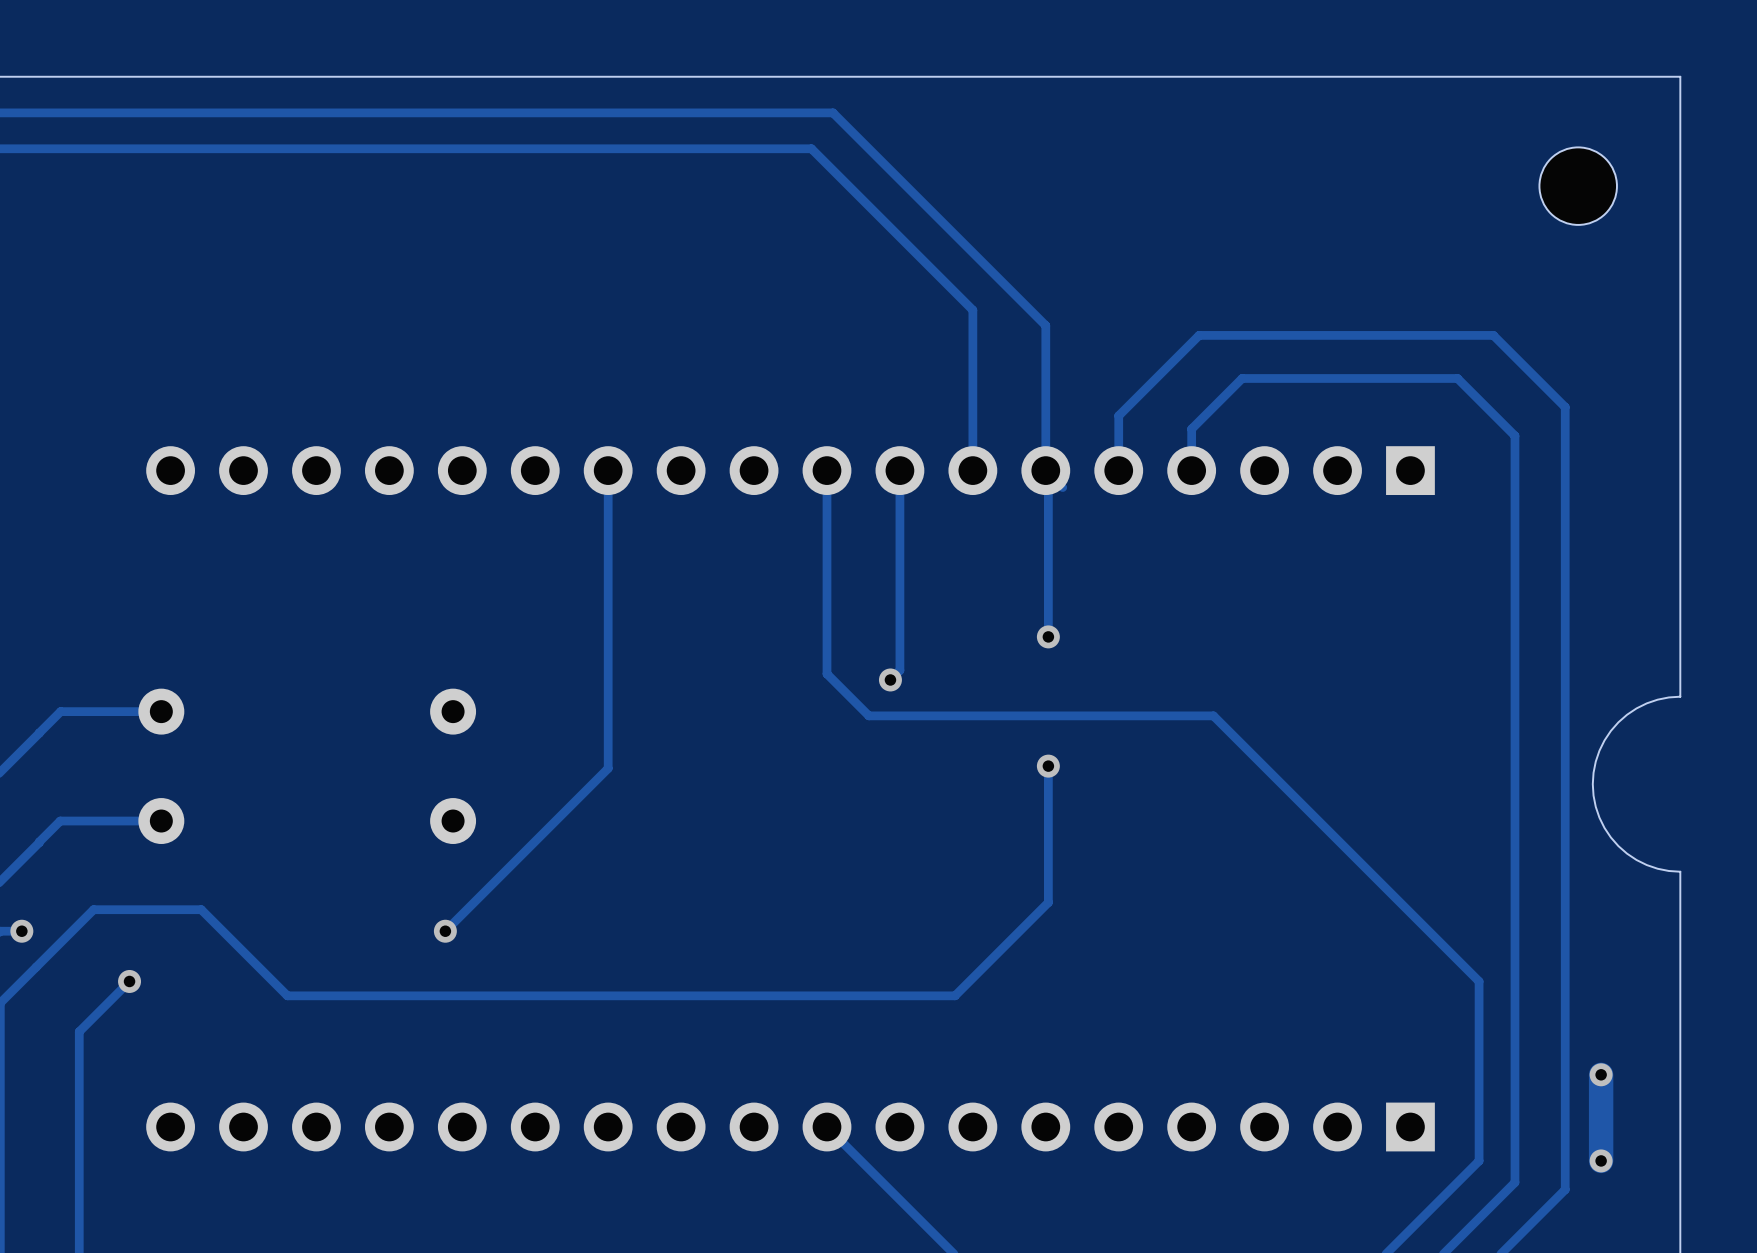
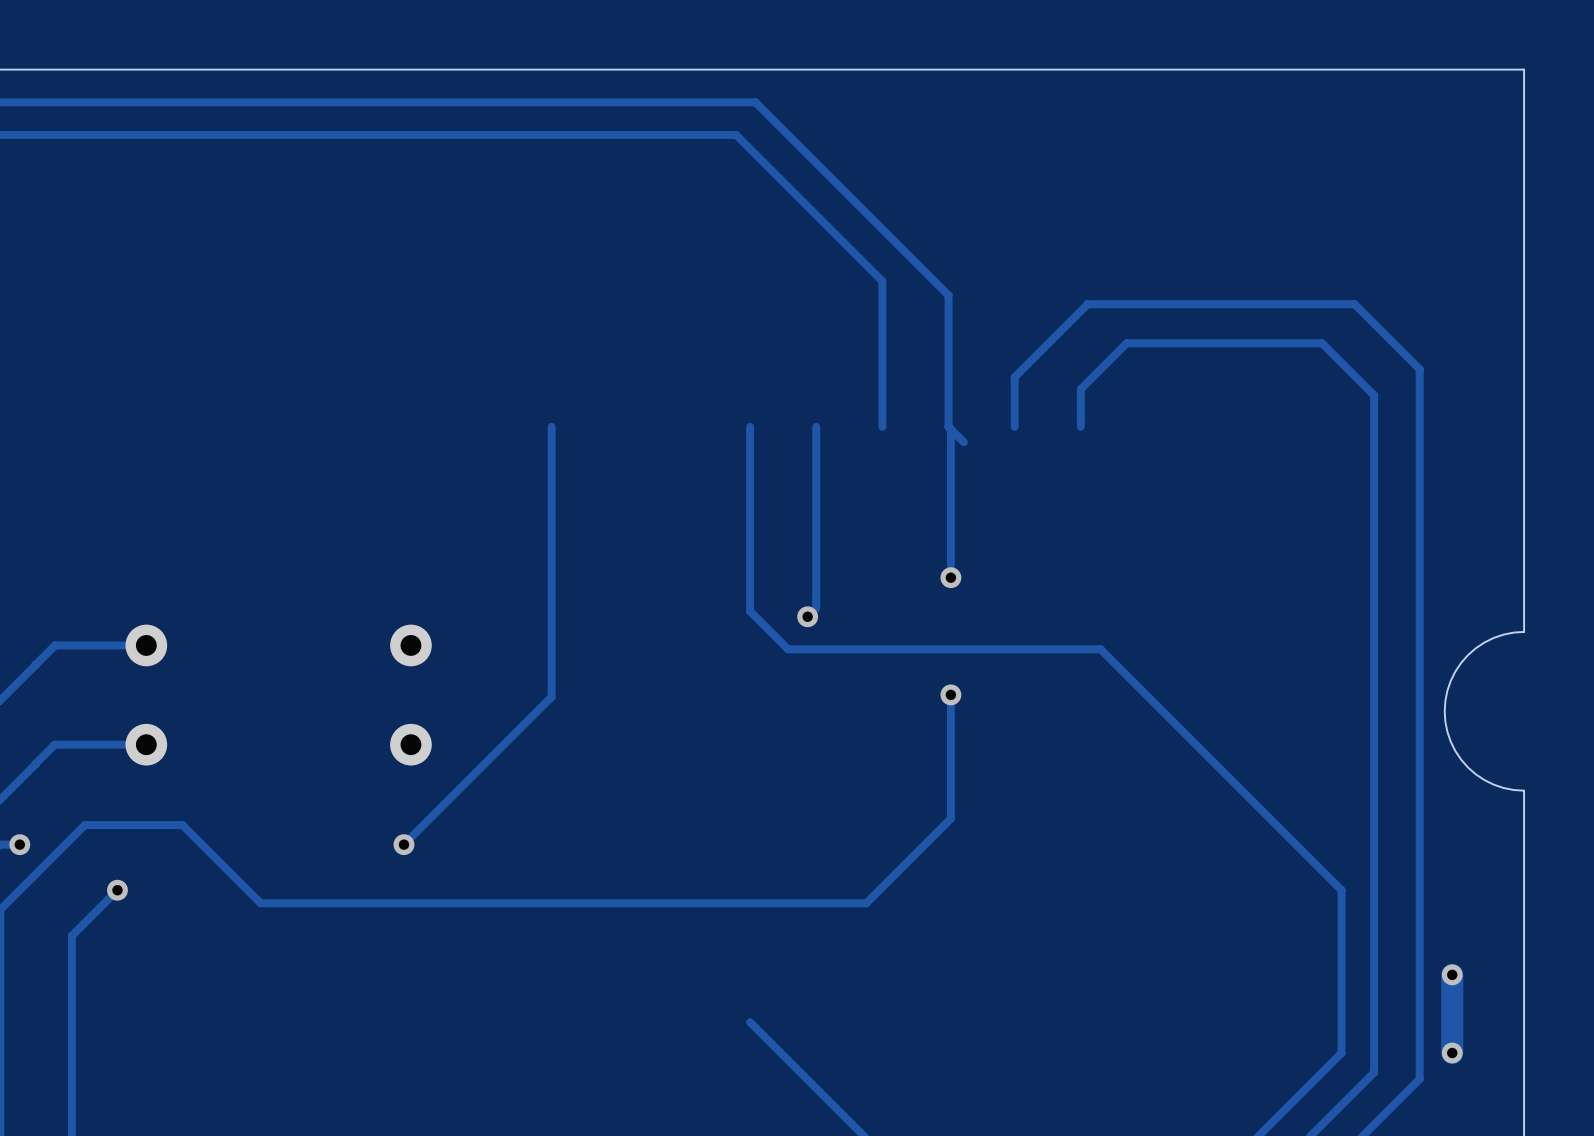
part: (1578, 186) -> none
part: (790, 470) -> none
part: (790, 1127) -> none

